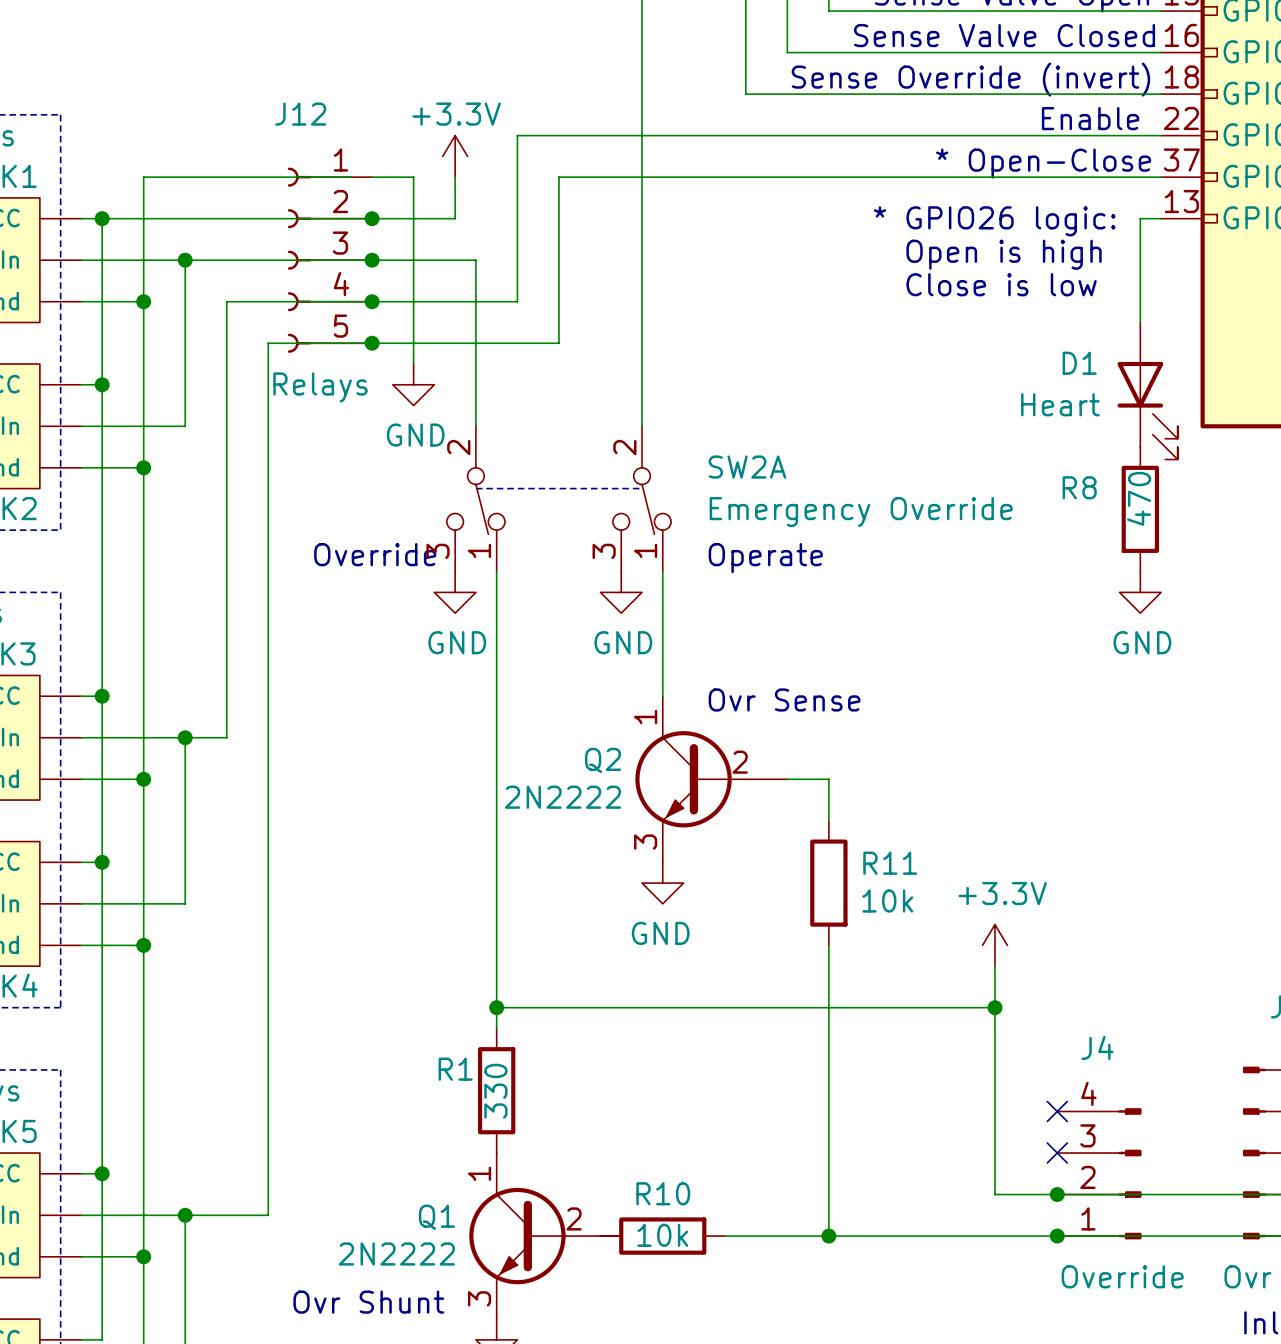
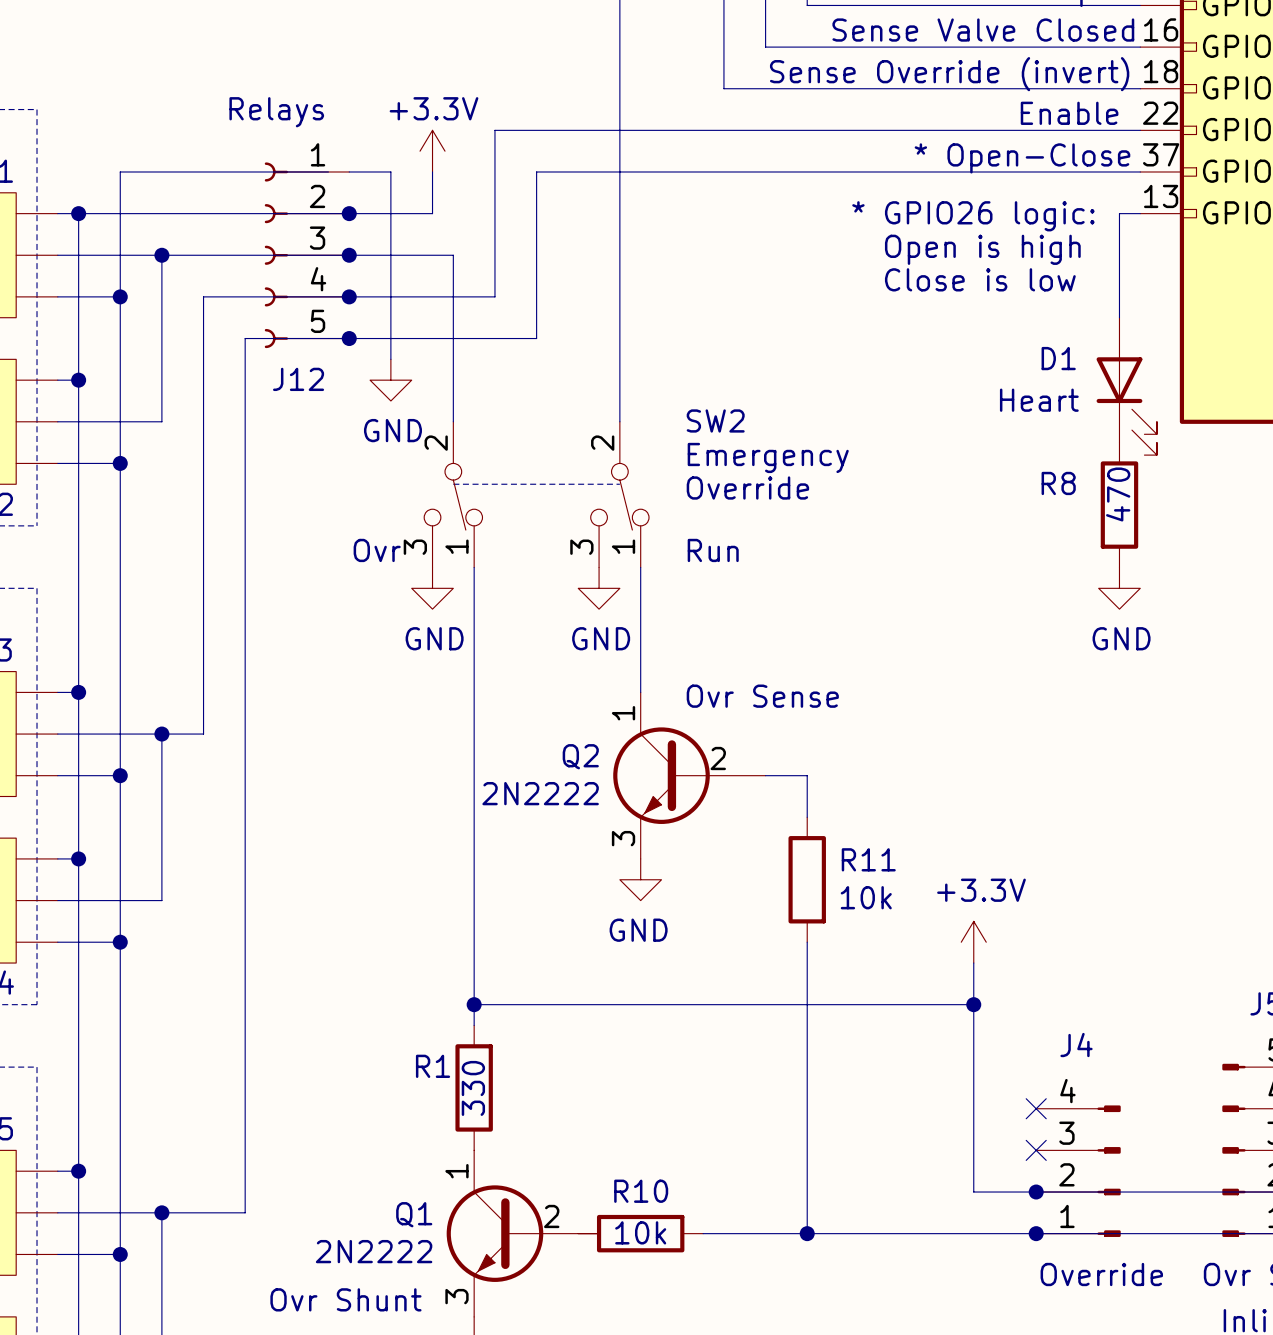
J12 name position: J12 (300, 114) -> J12 (298, 379)
J12 value position: Relays (320, 387) -> Relays (276, 112)
text: none -> SW2 (715, 420)
text: none -> Emergency (768, 457)
SW2A name: SW2A (747, 467) -> none
SW2A value: Emergency Override (861, 512) -> none
text position: Override (375, 554) -> Override (747, 488)
text: none -> Ovr (377, 550)
text: Operate (765, 558) -> Run (713, 550)

